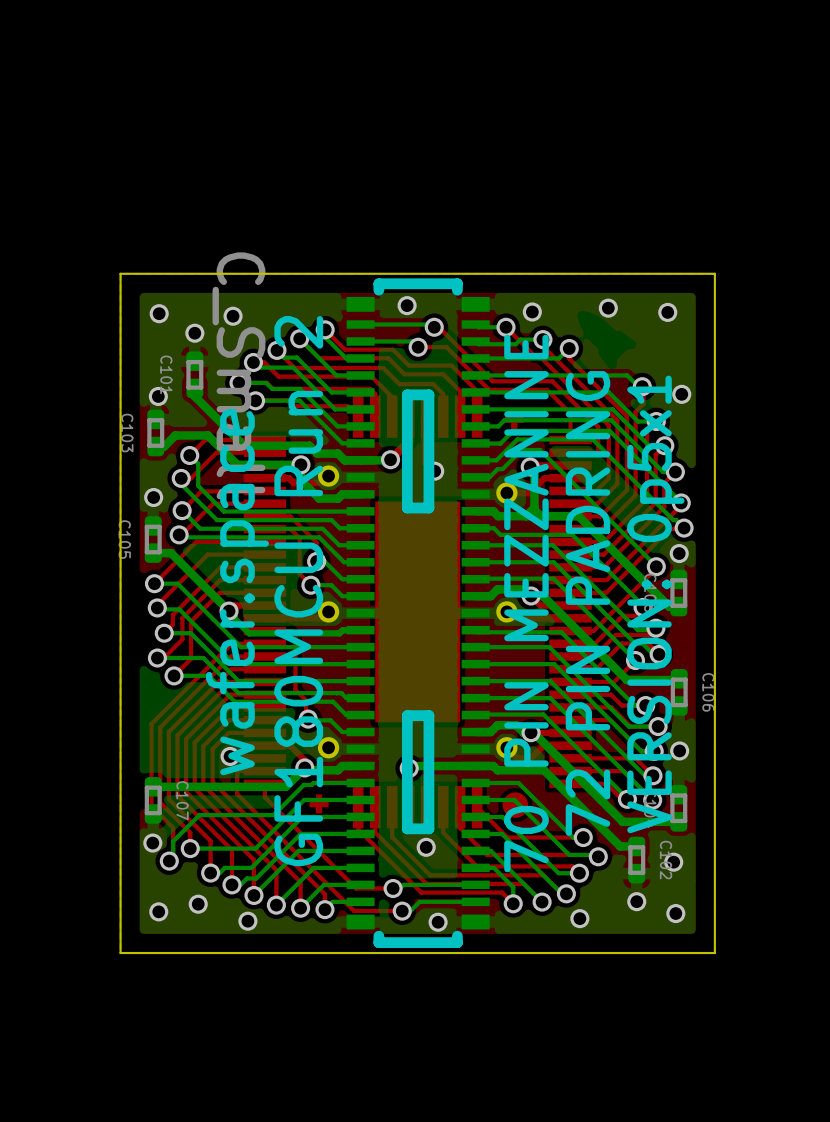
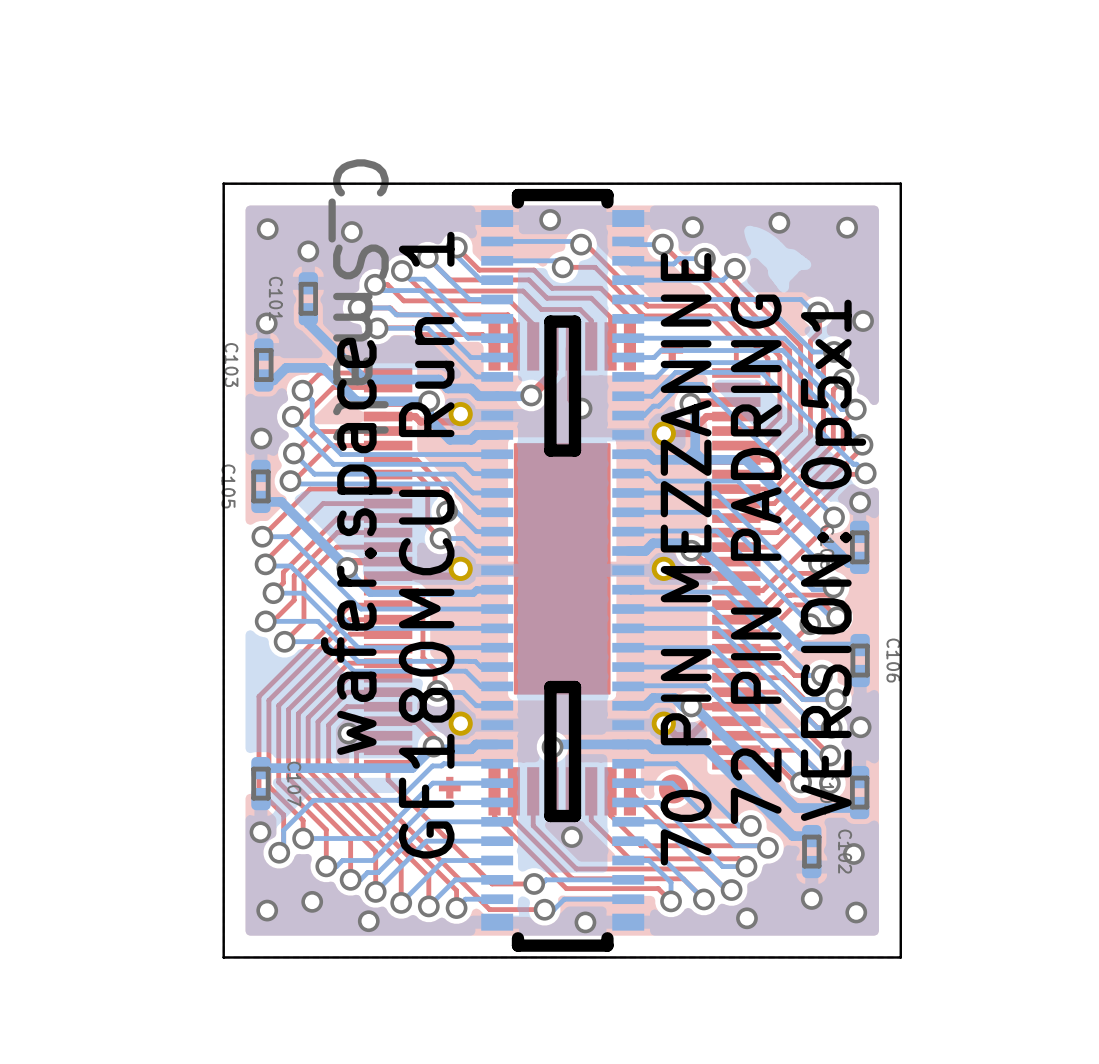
text: GF180MCU Run 2 (298, 591) -> GF180MCU Run 1 (426, 545)

